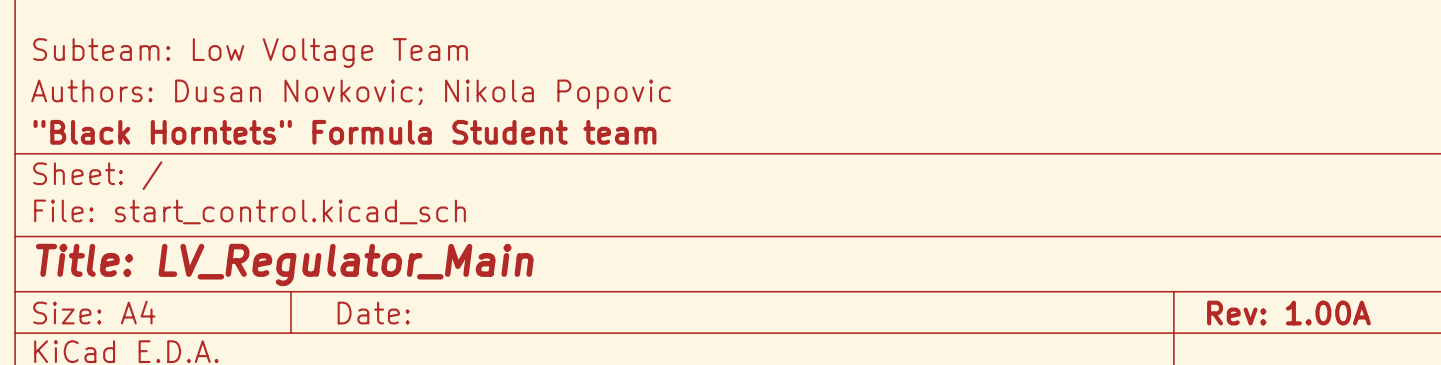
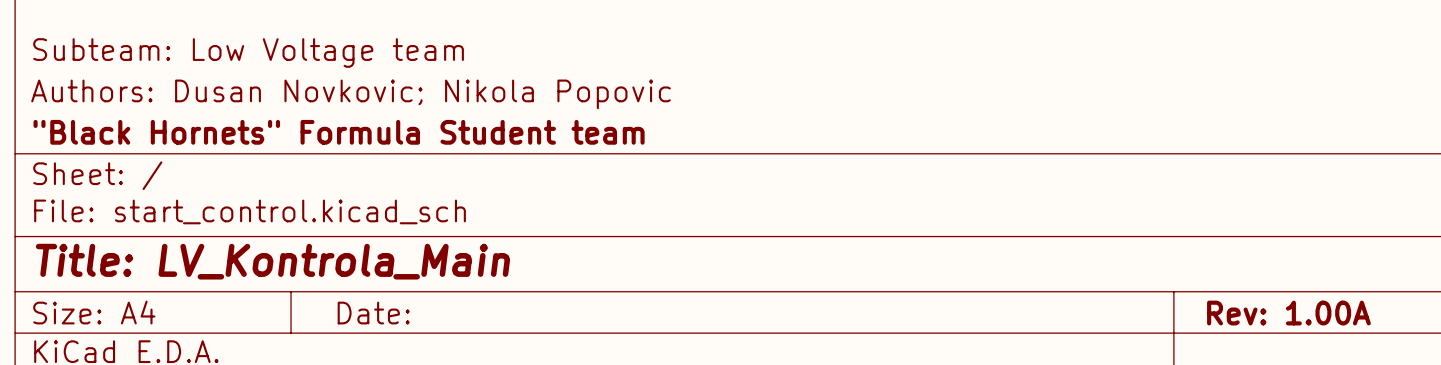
title block: Subteam: Low Voltage Team (250, 53) -> Subteam: Low Voltage team (248, 53)
title block: "Black Horntets" Formula Student team (344, 132) -> "Black Hornets" Formula Student team (339, 132)
title block: Title: LV_Regulator_Main (284, 264) -> Title: LV_Kontrola_Main (272, 261)

